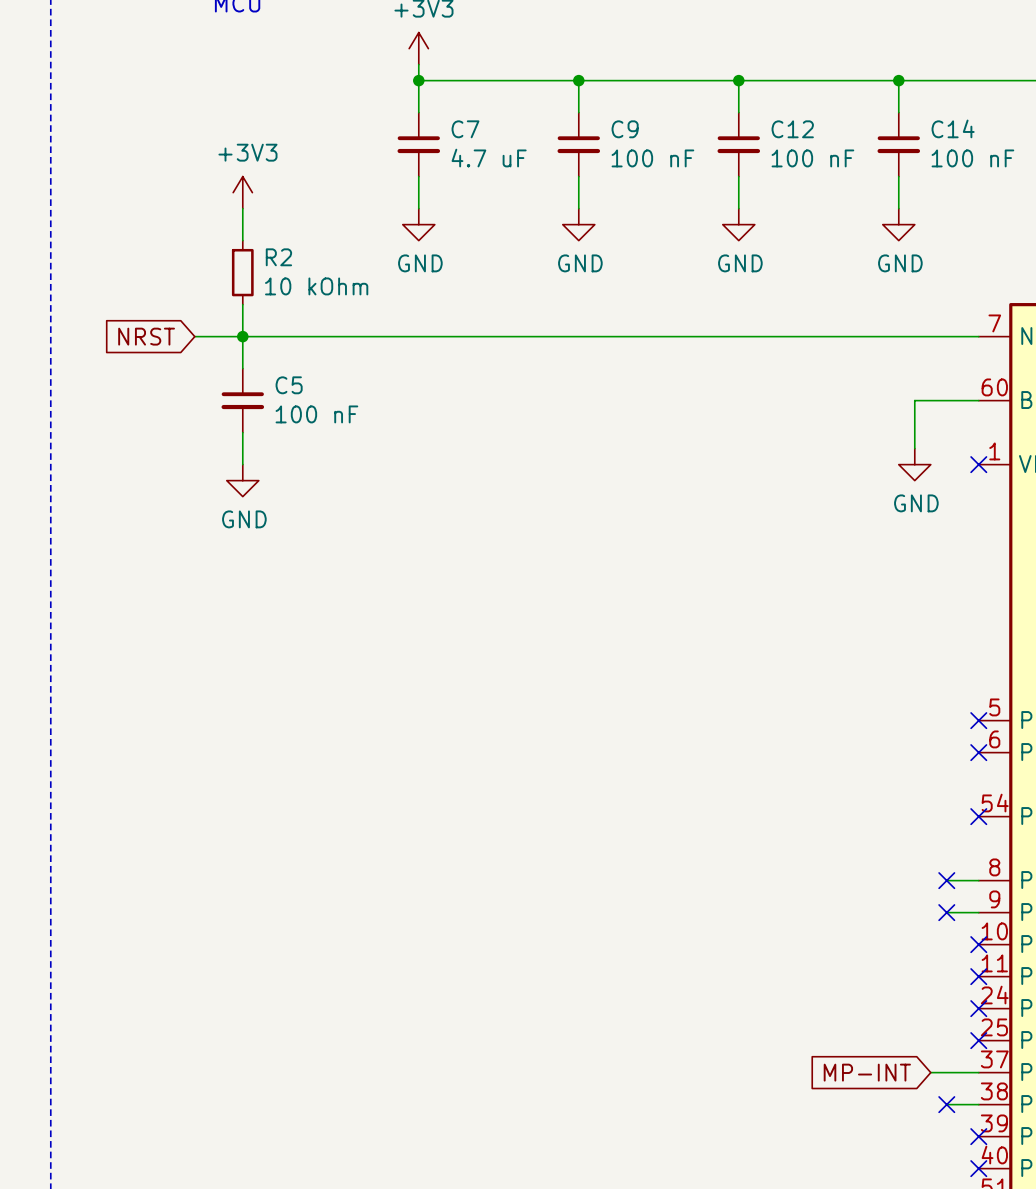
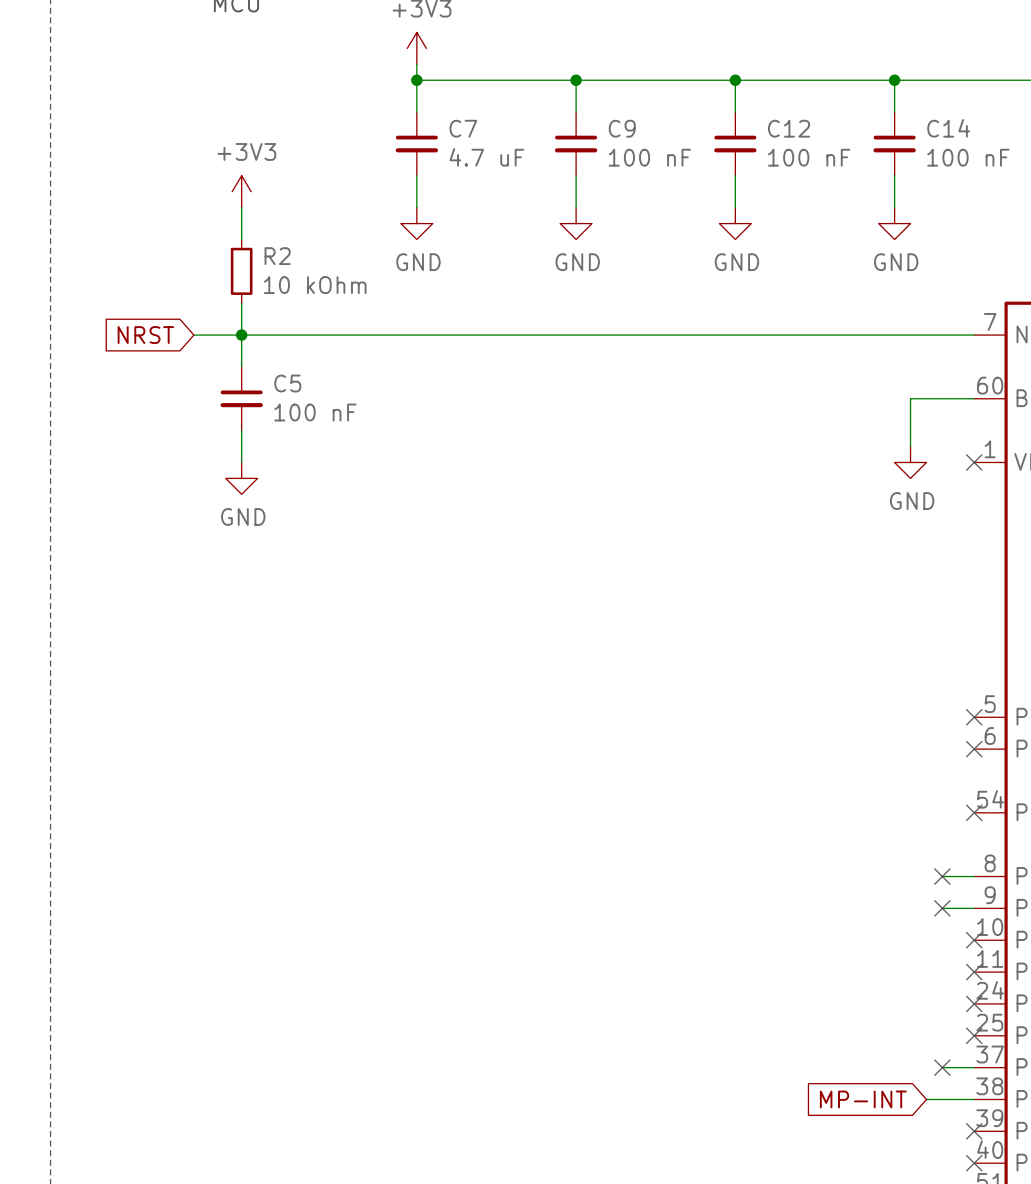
global label position: MP-INT (867, 1072) -> MP-INT (863, 1099)
wire: (930, 1072) (946, 1072) -> (926, 1099) (942, 1099)
no-connect mark position: (946, 1104) -> (942, 1067)

